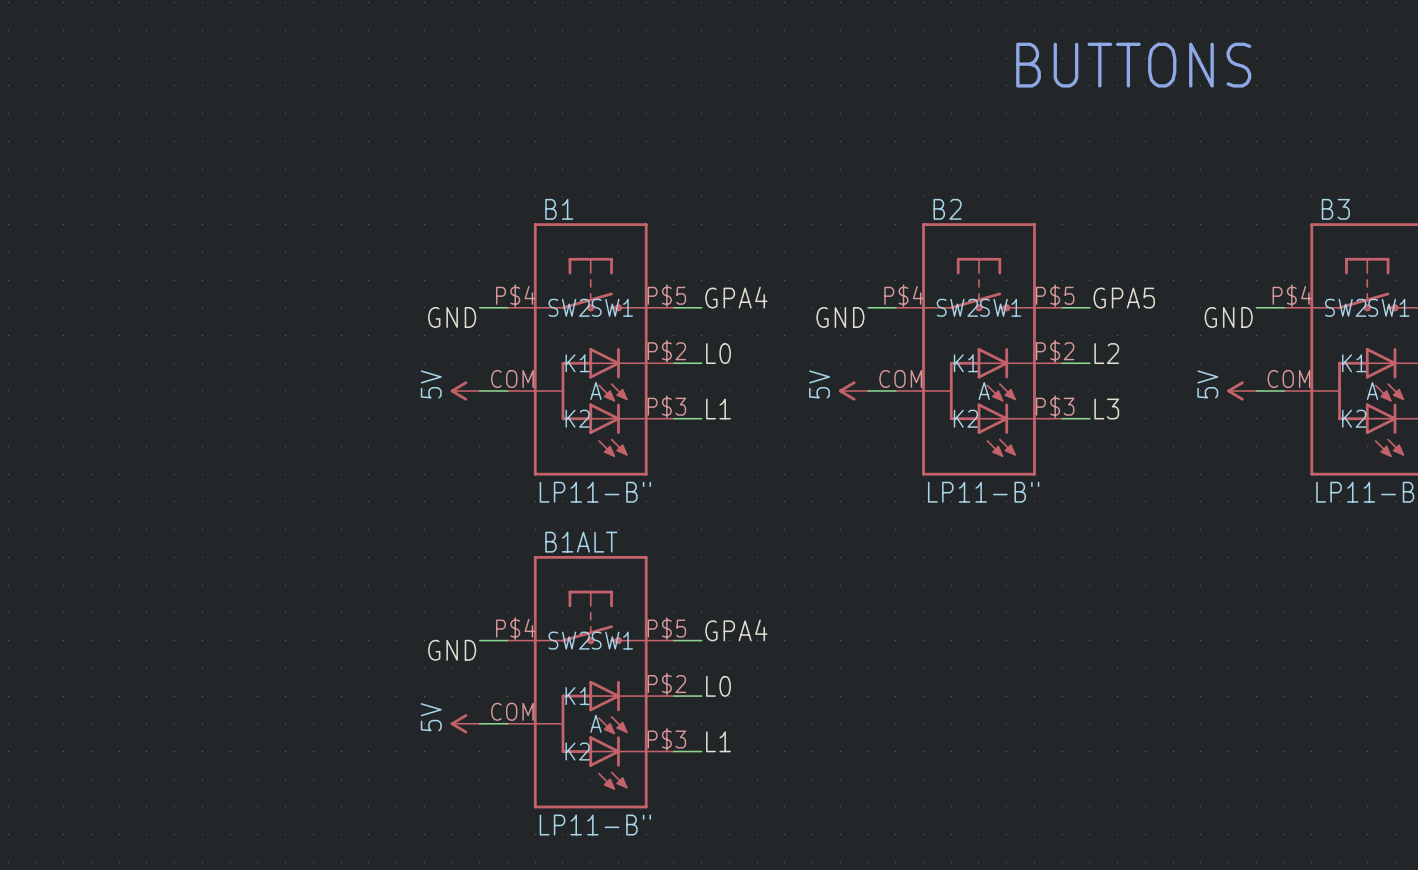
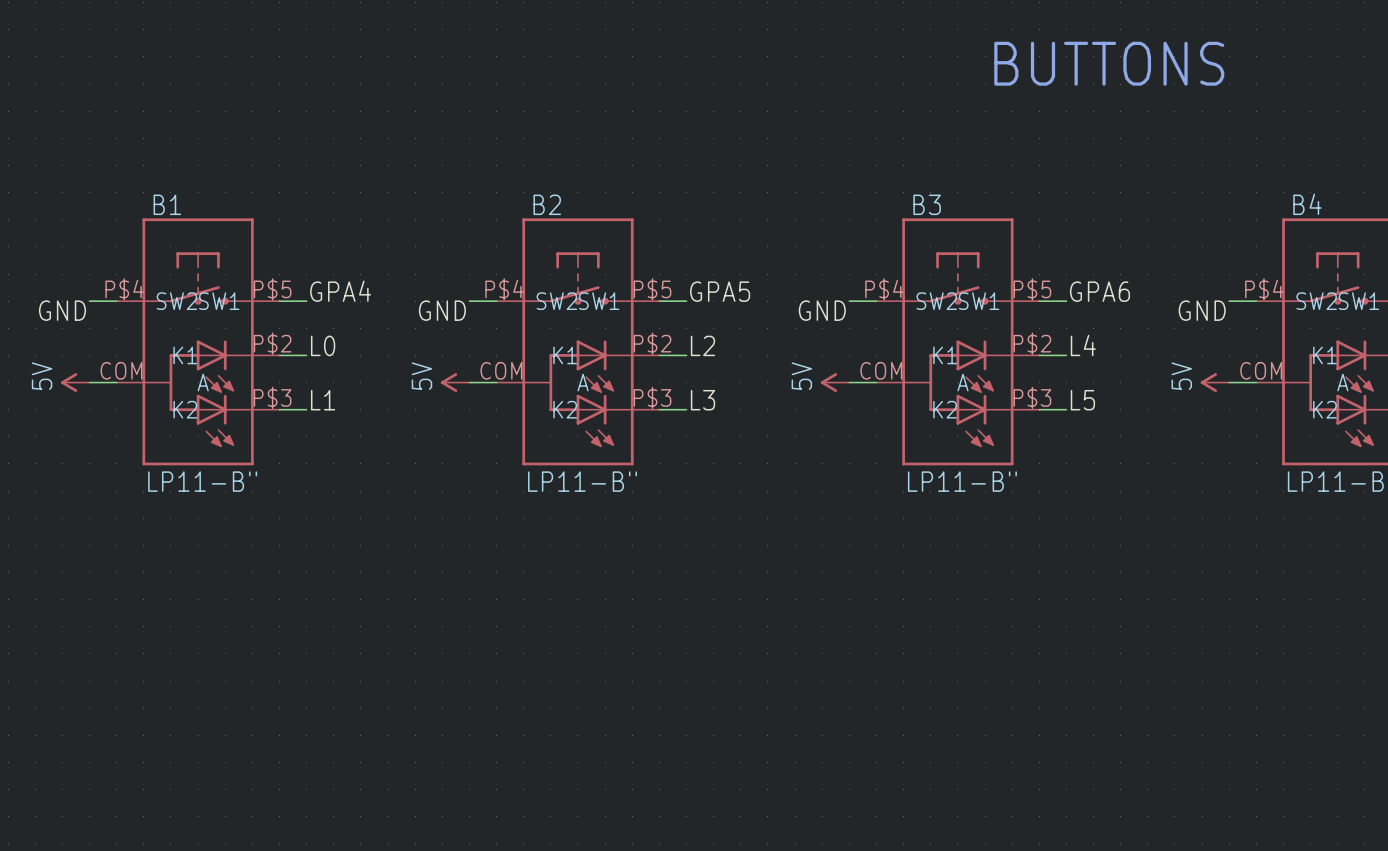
B1 name: B1 (559, 209) -> B2 (547, 204)
B2 name: B2 (947, 209) -> B3 (927, 204)
B3 name: B3 (1335, 209) -> B4 (1307, 204)
label: none -> GPA4 (340, 291)
label: GPA4 (736, 297) -> GPA5 (720, 291)
label: GPA5 (1124, 298) -> GPA6 (1099, 291)
wire: none -> (89, 301) (116, 301)
wire: none -> (279, 301) (306, 301)
label: none -> GND (62, 310)
B1: none -> LP11-B" (198, 341)
label: none -> L0 (323, 345)
label: L0 (718, 353) -> L2 (703, 345)
label: L2 (1106, 353) -> L4 (1083, 345)
wire: none -> (279, 355) (306, 355)
power symbol: none -> 5V (75, 382)
wire: none -> (89, 382) (116, 382)
label: none -> L1 (323, 400)
label: L1 (718, 409) -> L3 (703, 400)
label: L3 (1106, 409) -> L5 (1082, 400)
wire: none -> (279, 409) (306, 409)
label: GPA4 (736, 630) -> none
wire: (479, 640) (507, 640) -> none
wire: (673, 640) (701, 640) -> none
label: GND (452, 650) -> none
B1ALT: LP11-B" (590, 682) -> none
label: L0 (718, 686) -> none
wire: (673, 696) (701, 696) -> none
power symbol: 5V (465, 723) -> none
wire: (479, 723) (507, 723) -> none
label: L1 (718, 741) -> none
wire: (673, 751) (701, 751) -> none

